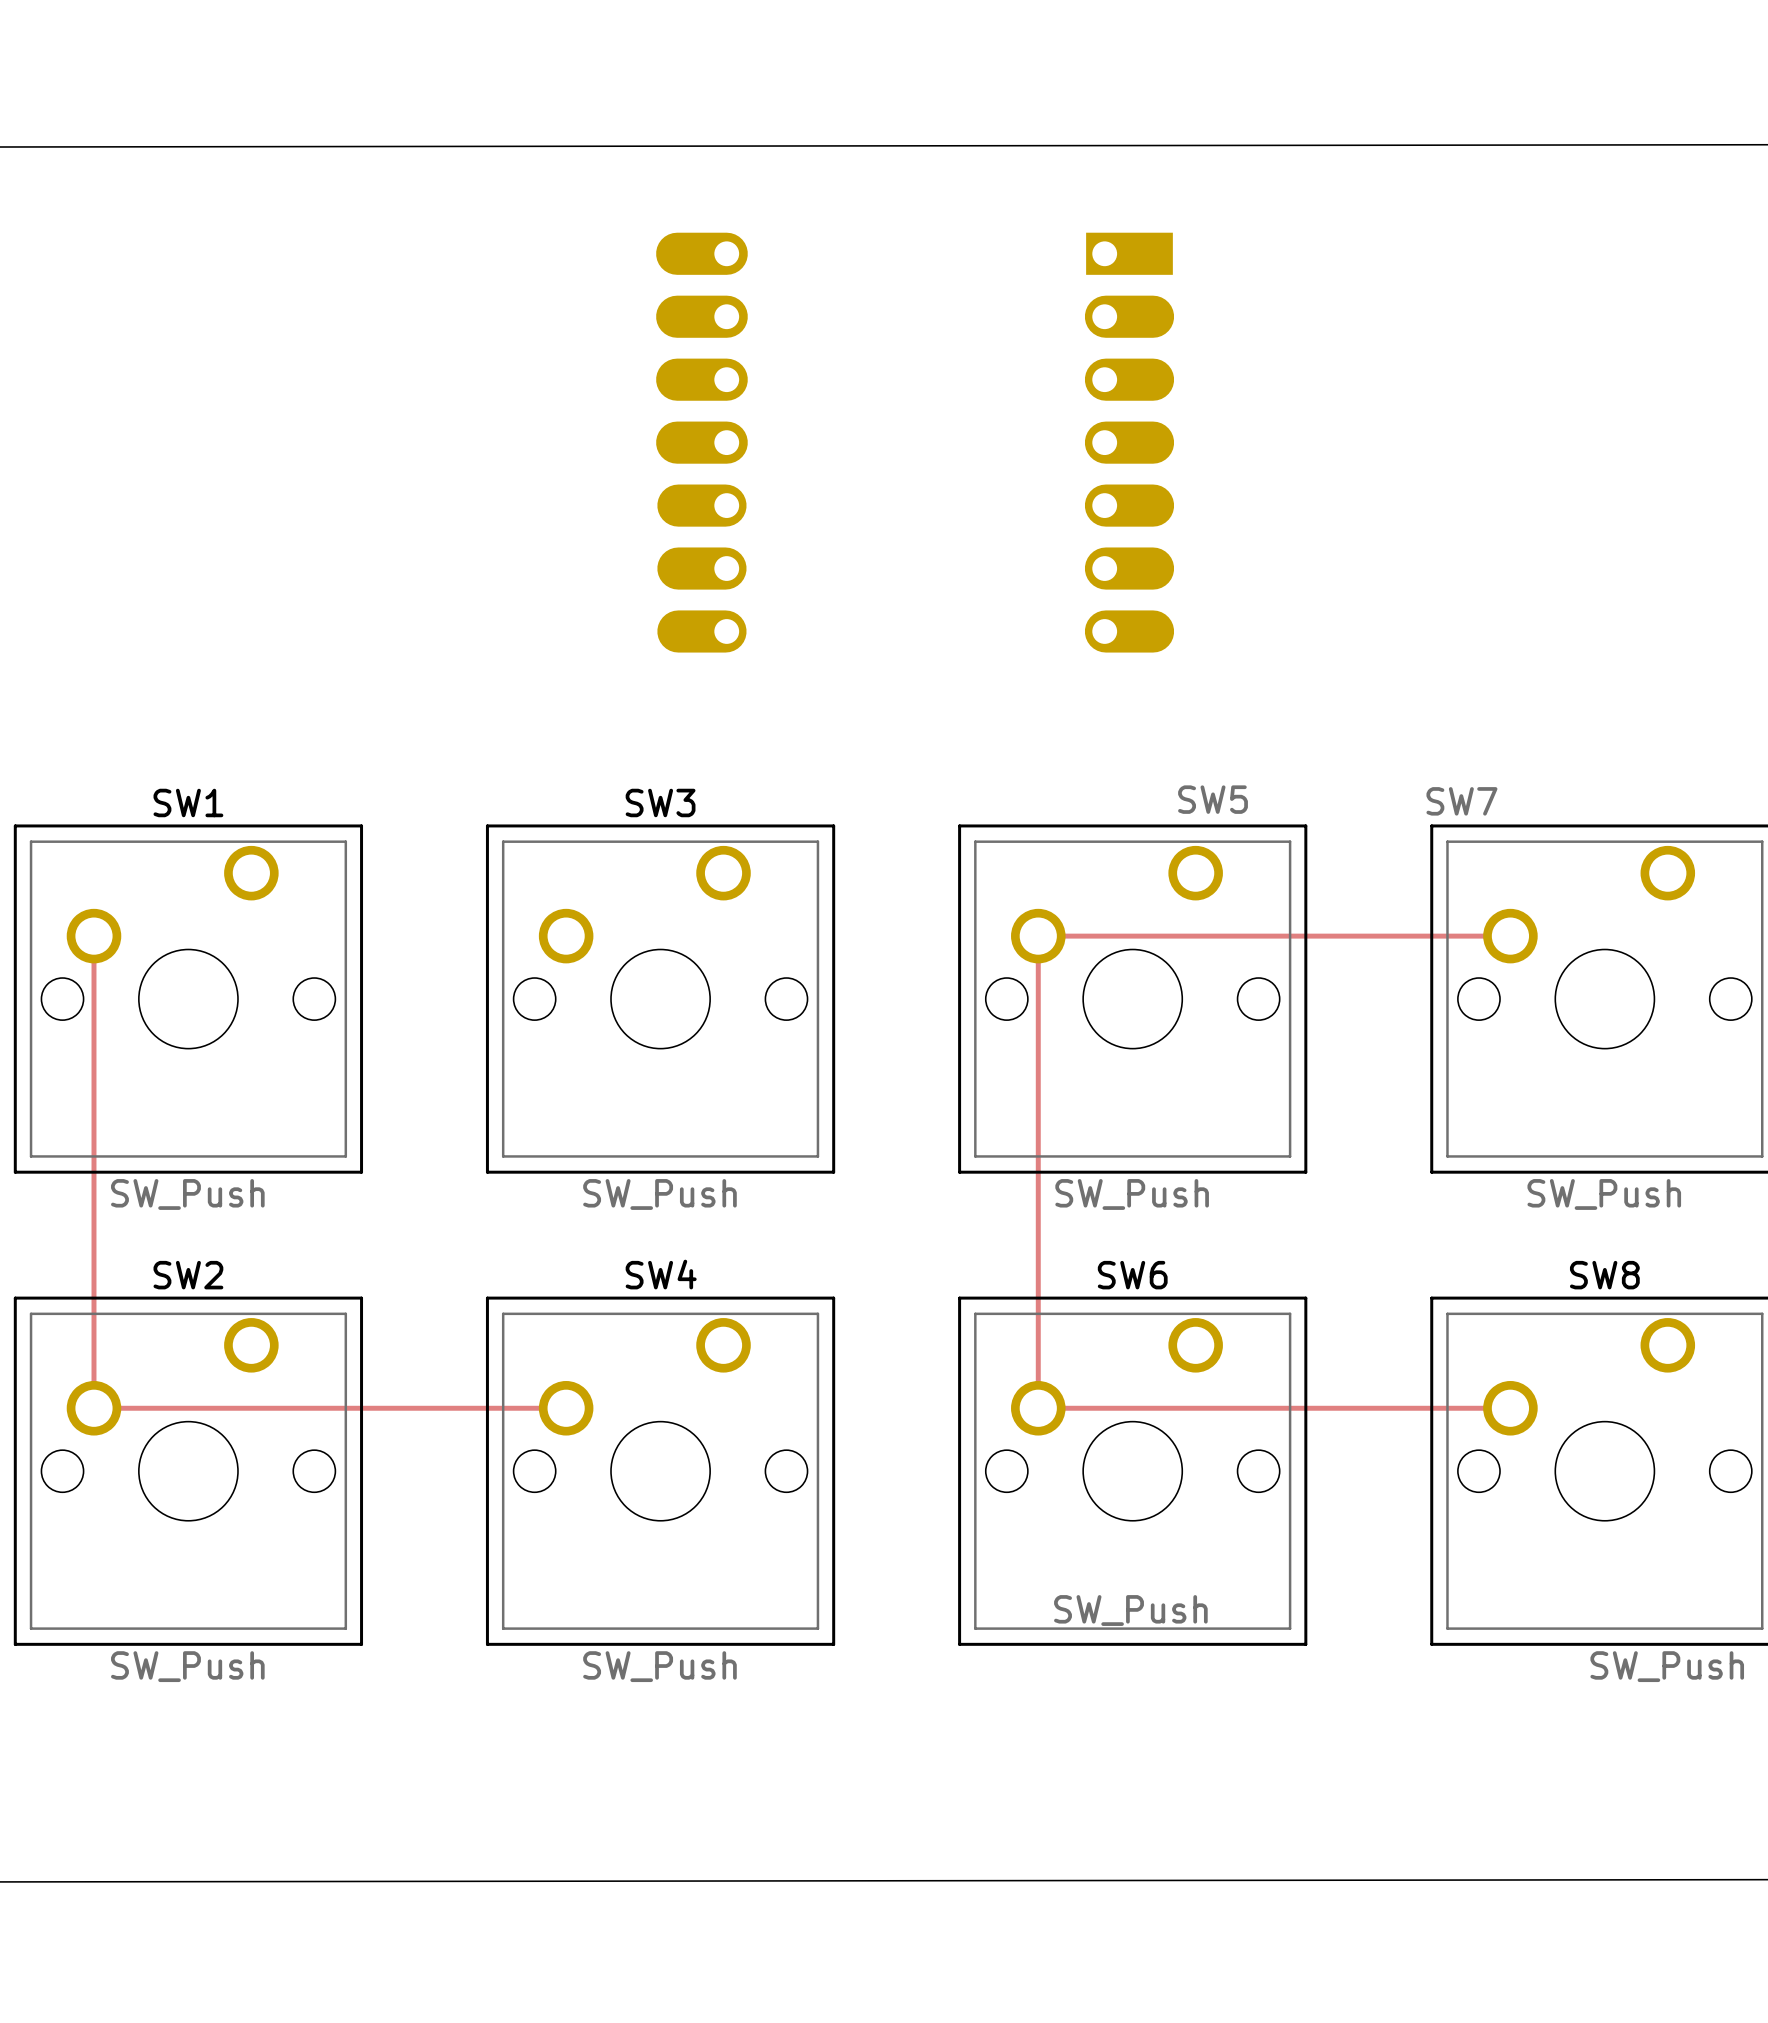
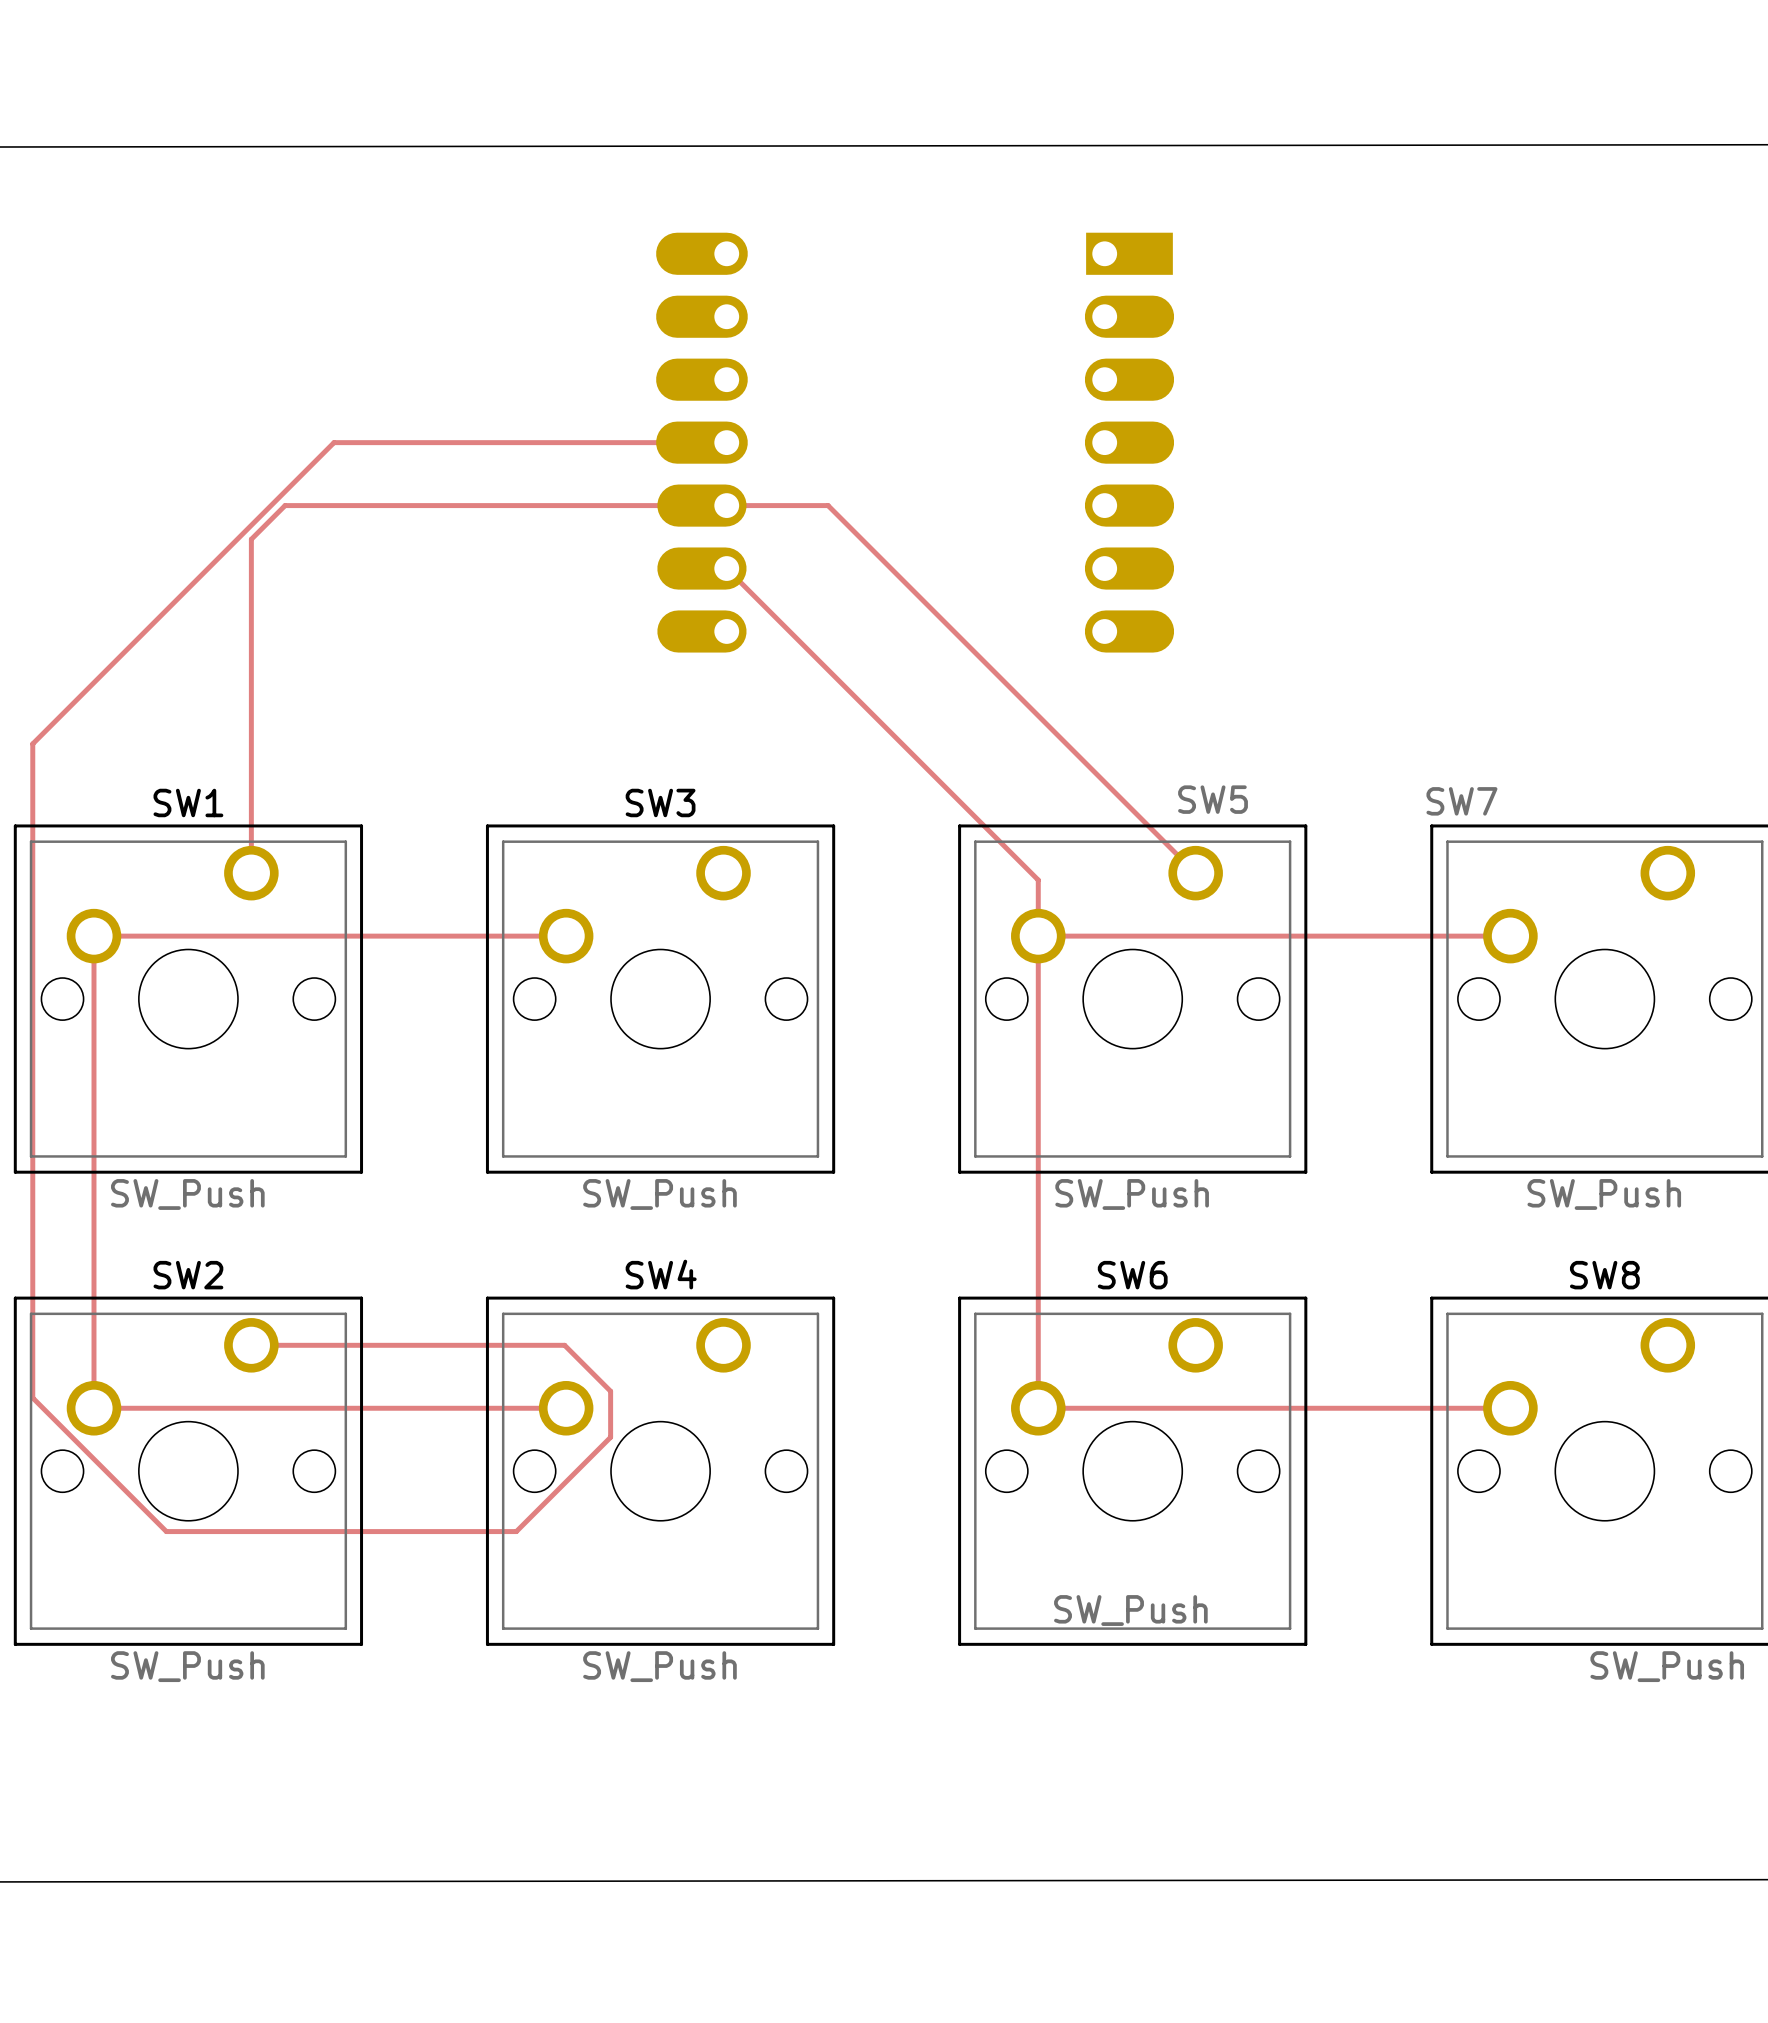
track: none -> (726, 442) (334, 442) (32, 743) (32, 1397) (166, 1531) (516, 1531) (610, 1437) (610, 1391) (564, 1345) (251, 1345)
track: none -> (726, 568) (1038, 880) (1038, 936)
track: none -> (251, 873) (251, 539) (285, 505) (828, 505) (1195, 873)
track: none -> (93, 936) (566, 936)

